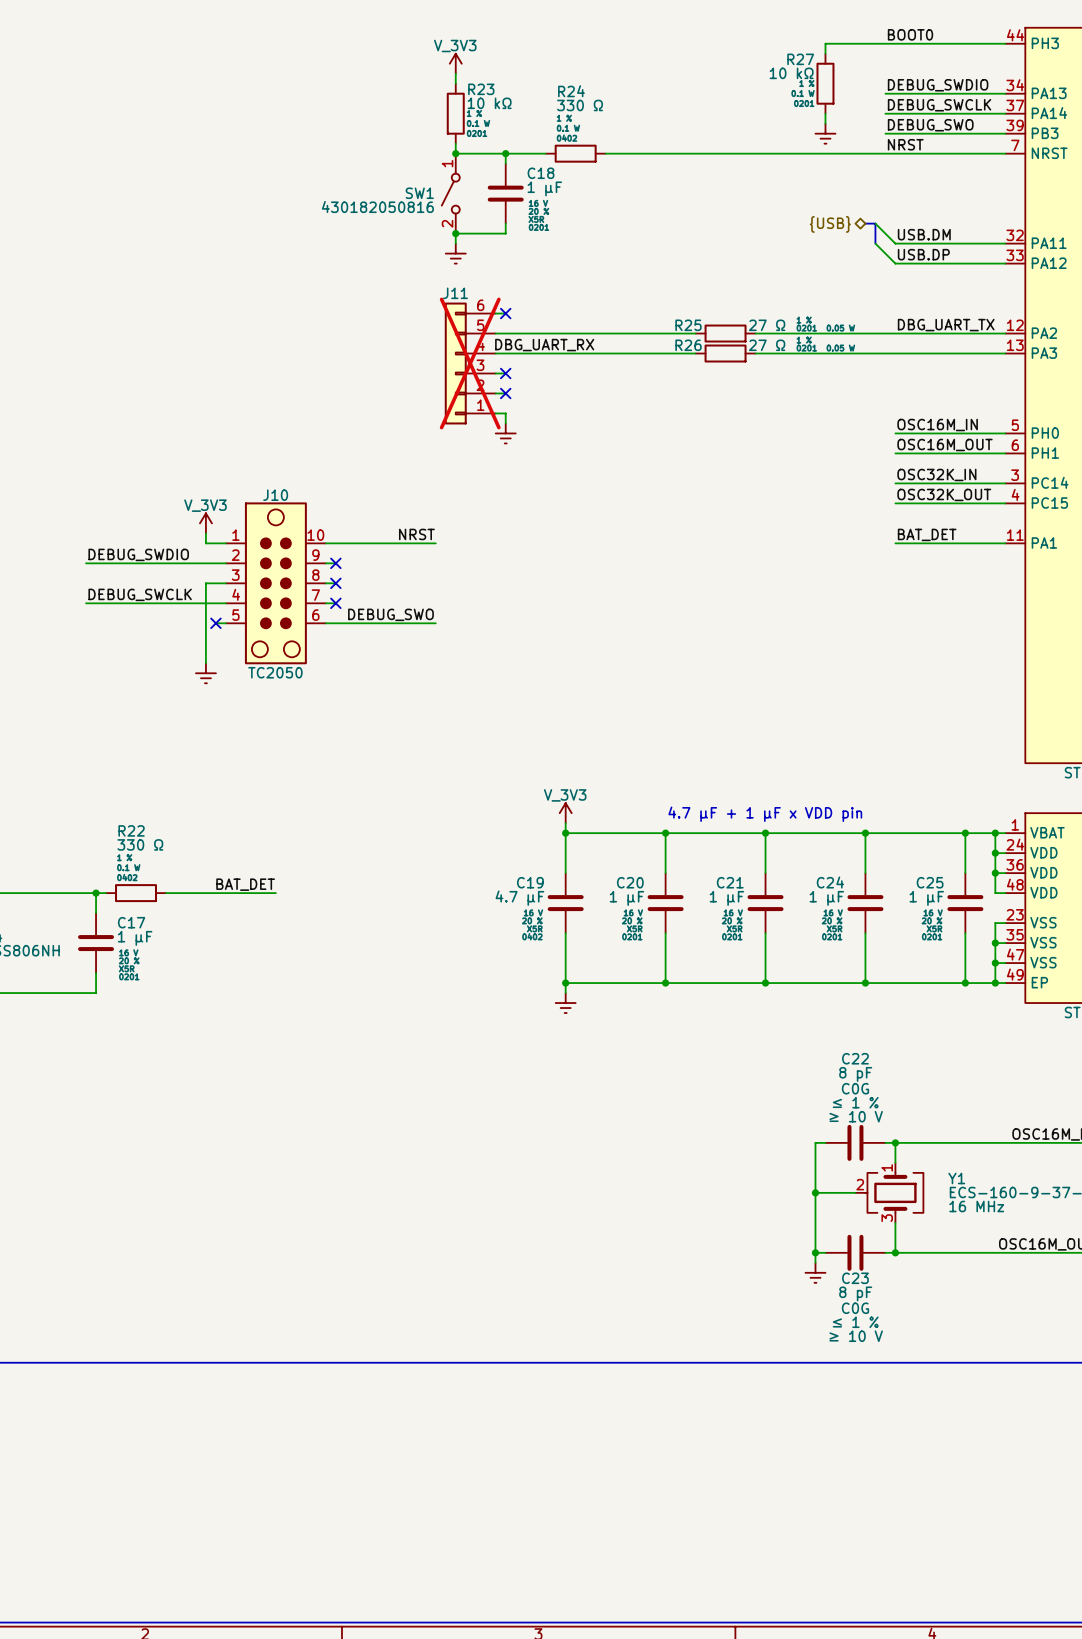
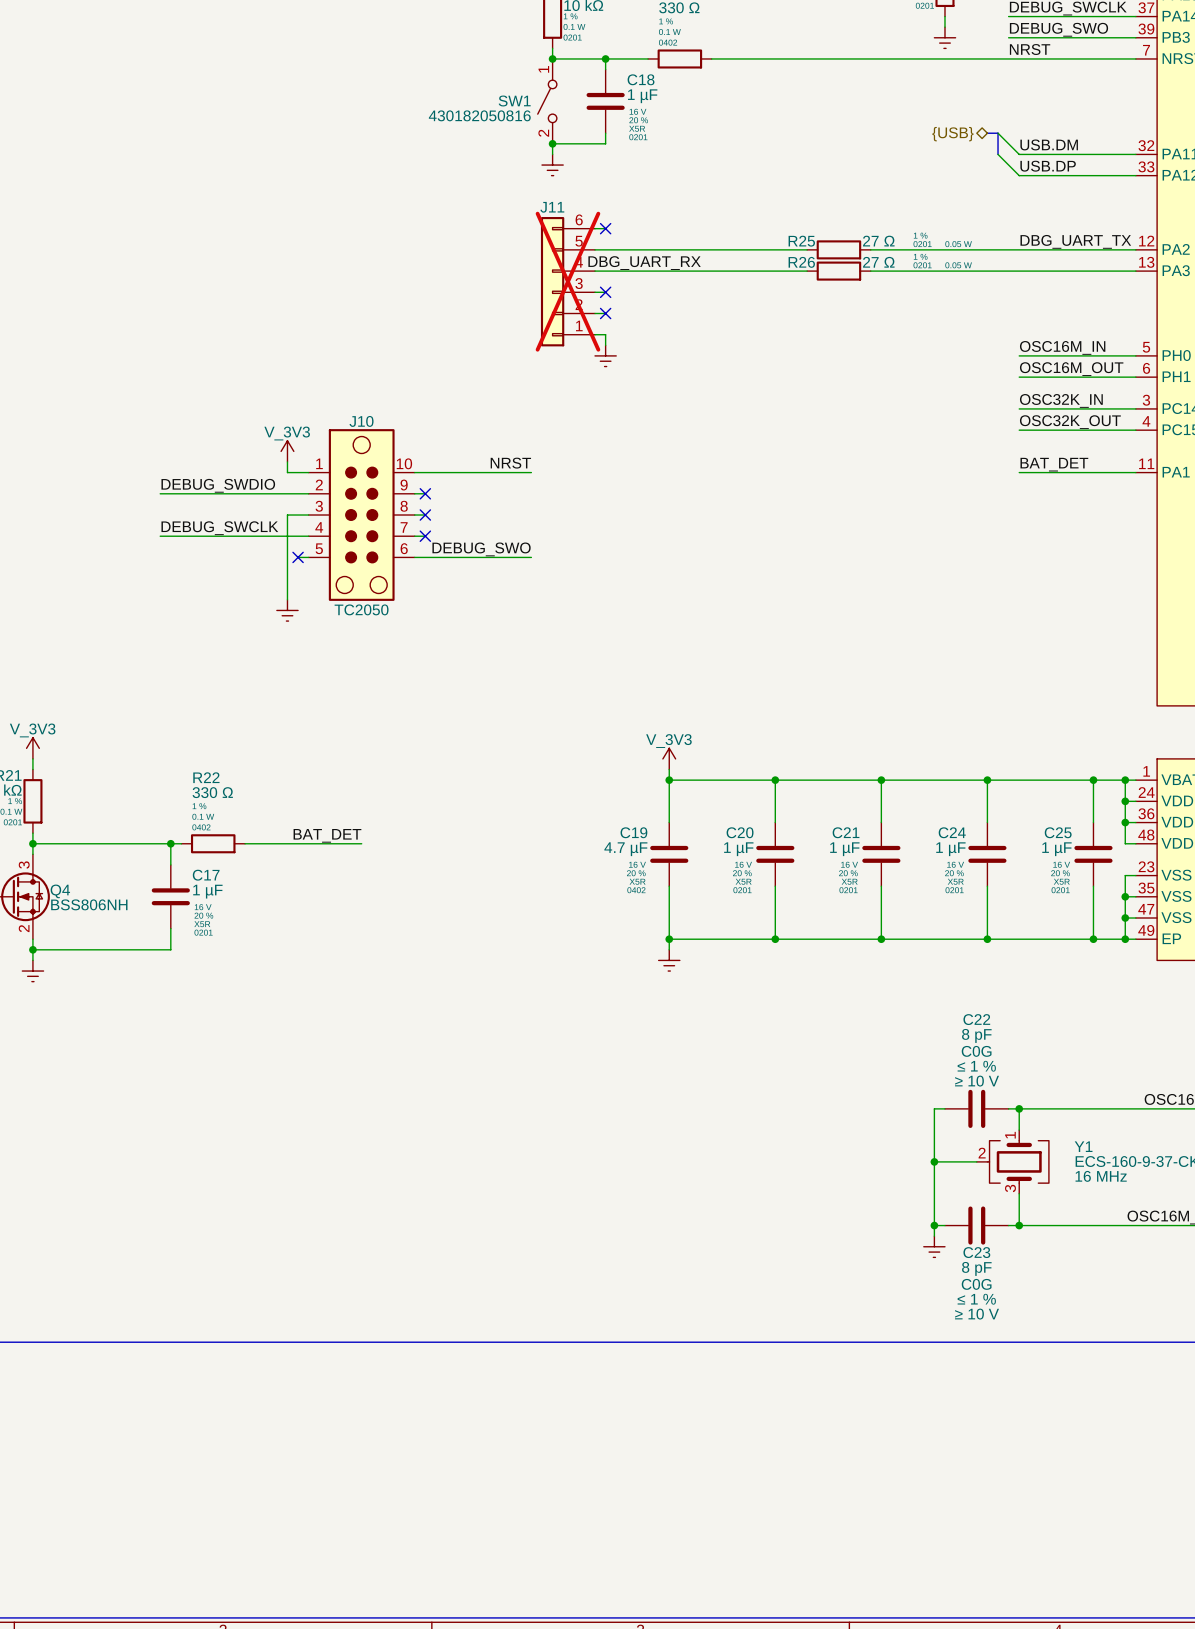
text: 4.7 µF + 1 µF x VDD pin (765, 814) -> none

